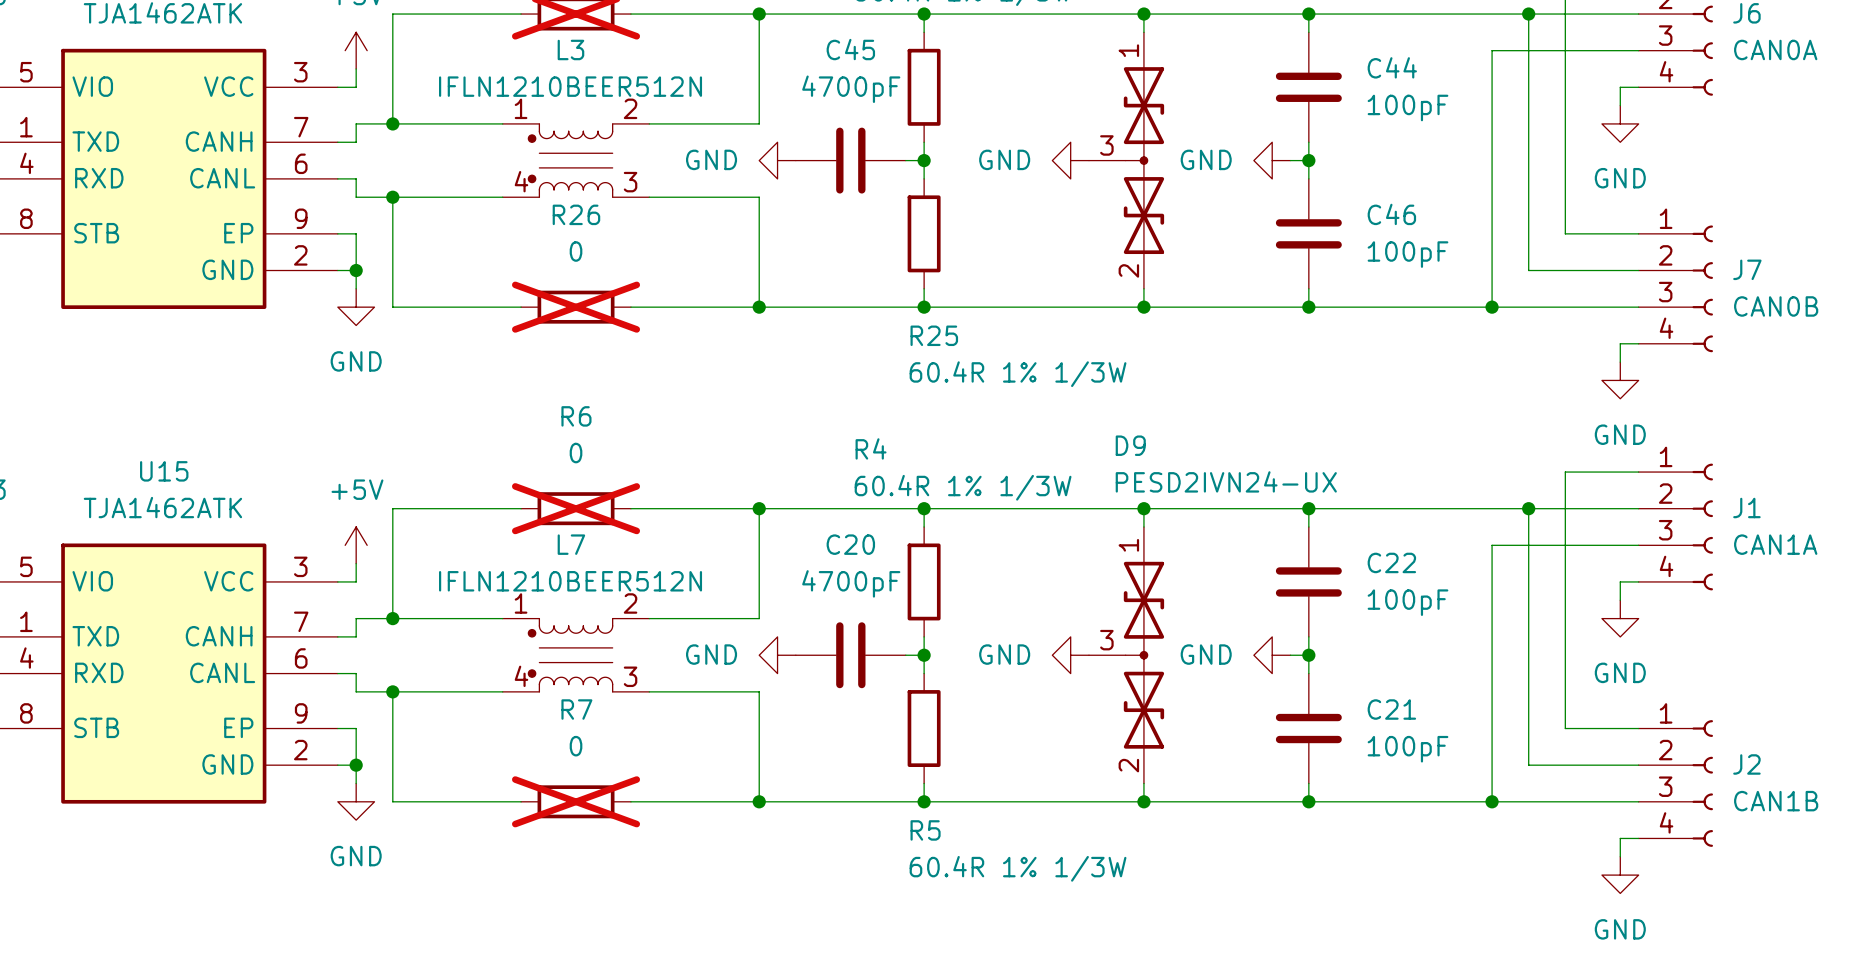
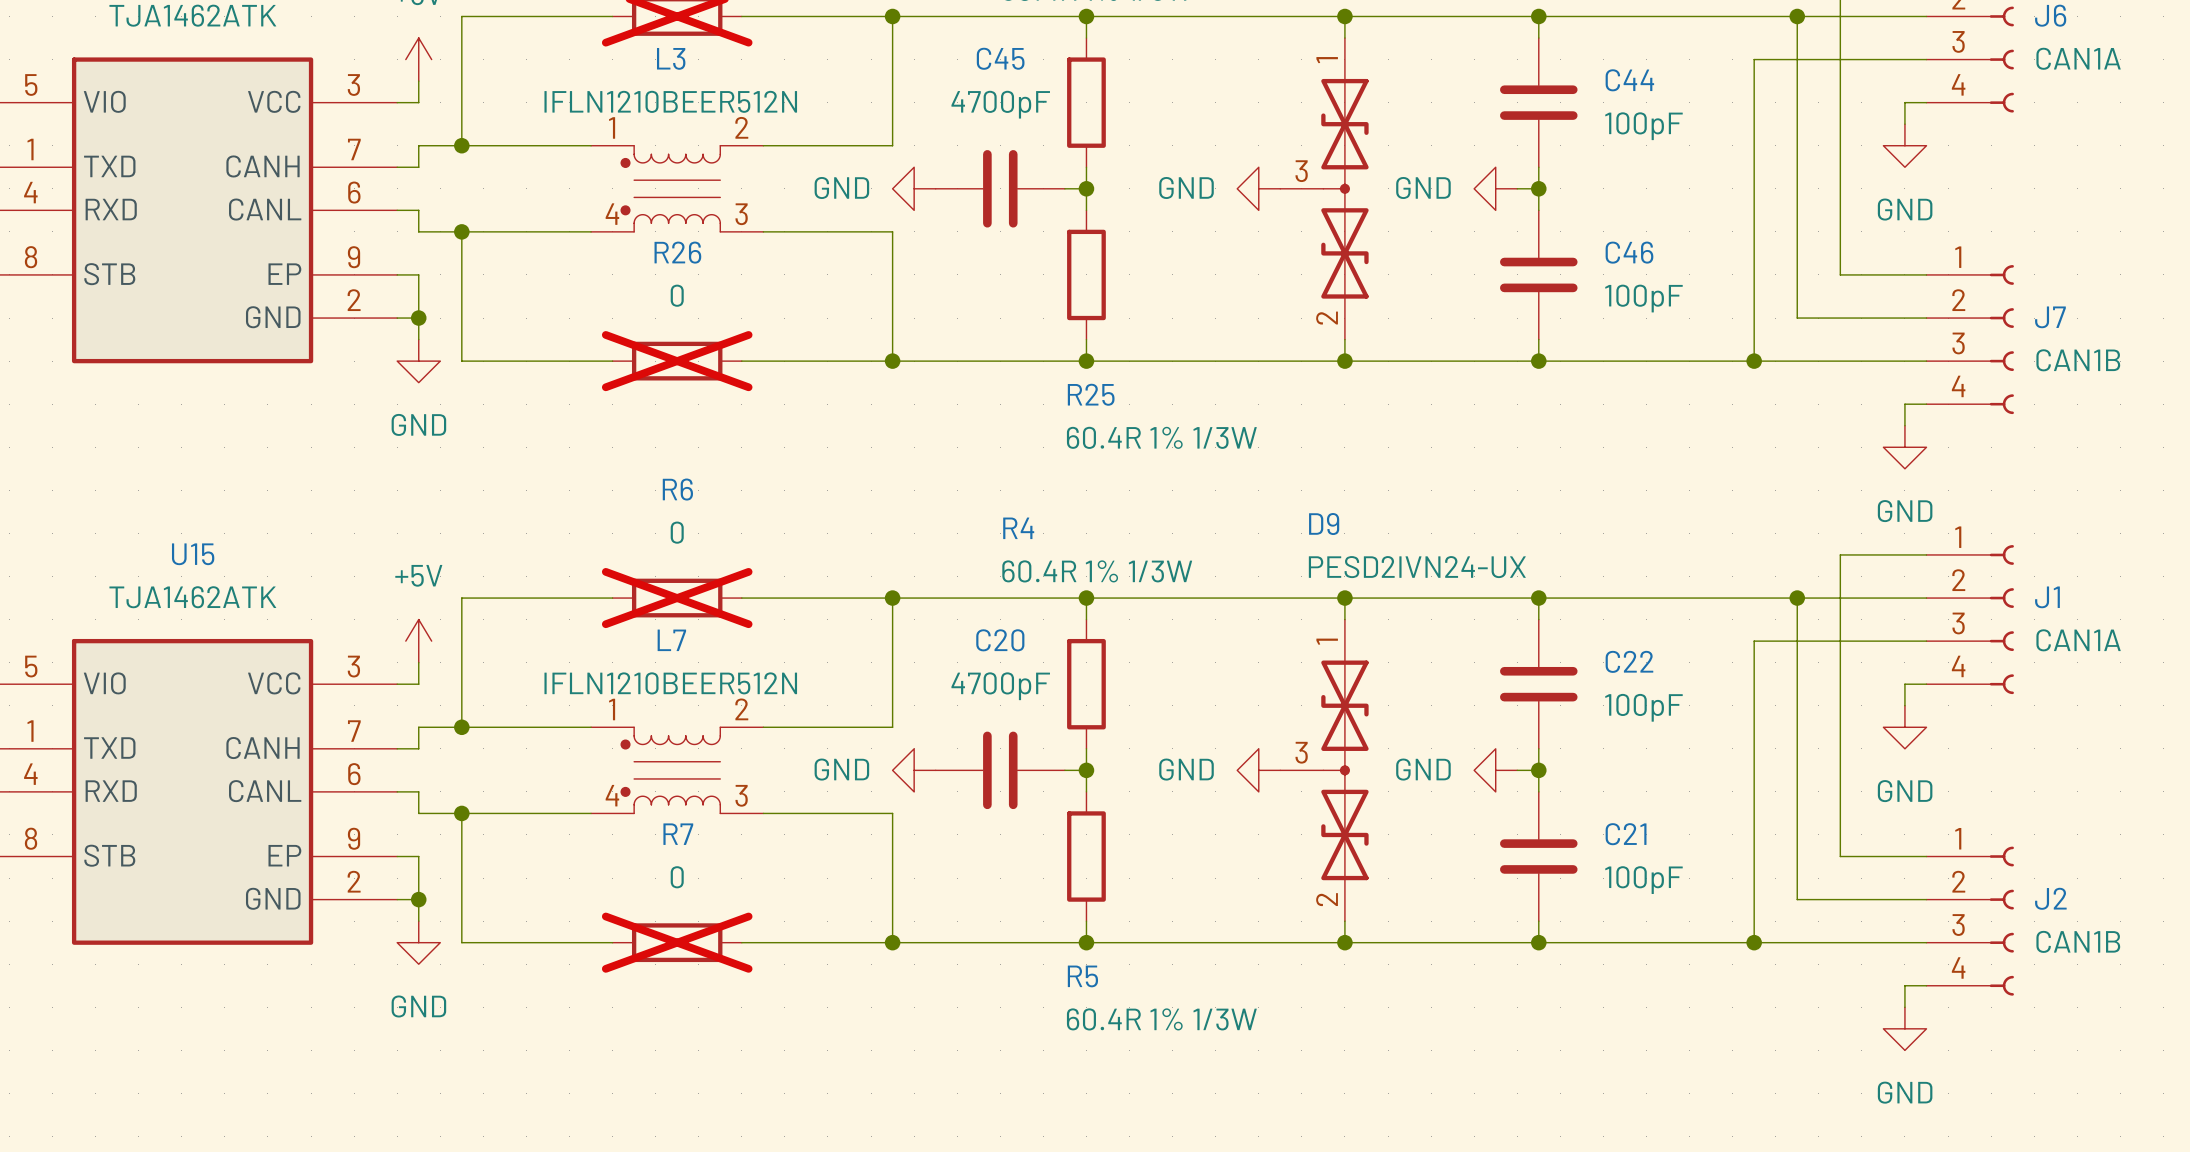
J6 value: CAN0A (1775, 49) -> CAN1A (2078, 58)
J7 value: CAN0B (1776, 306) -> CAN1B (2078, 360)

